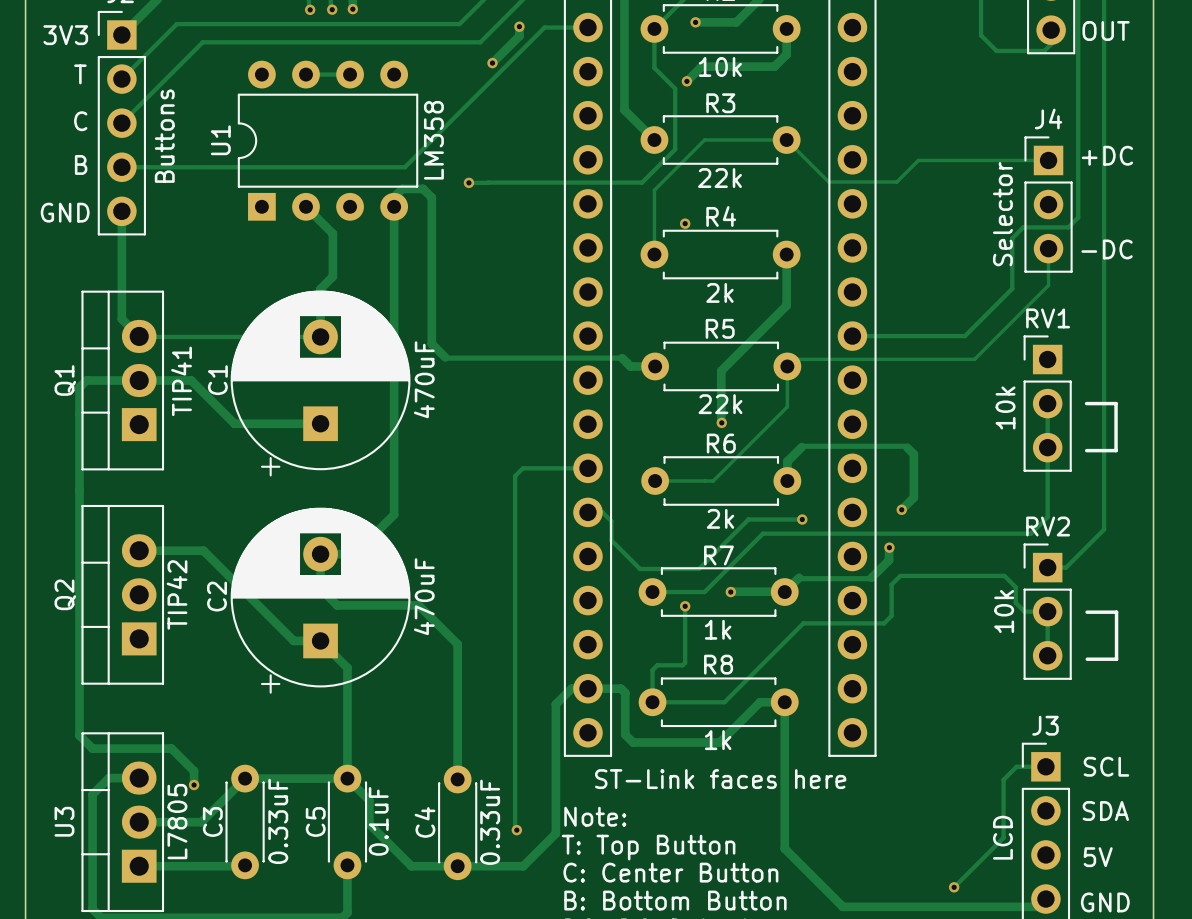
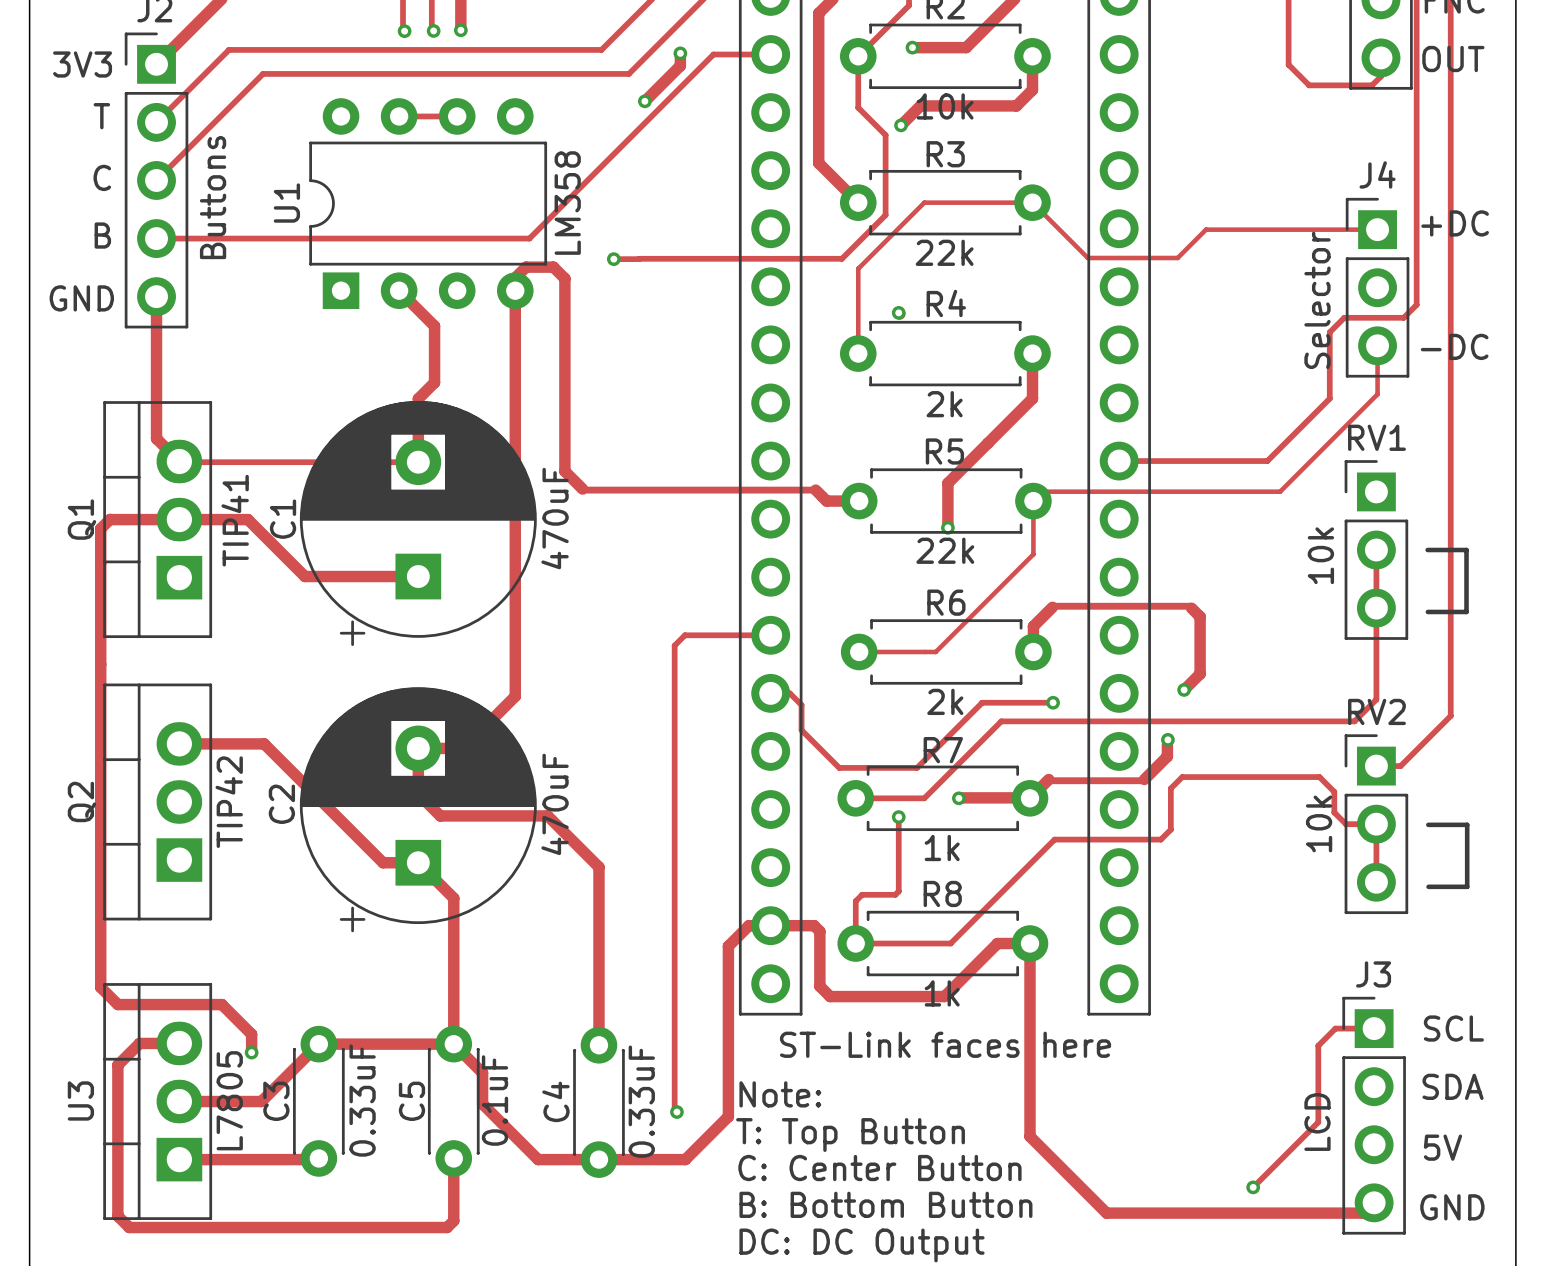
track: (786, 288) (786, 305) (721, 370) (721, 422) -> (1032, 398) (947, 483) (947, 527)
via position: (721, 422) -> (947, 527)

